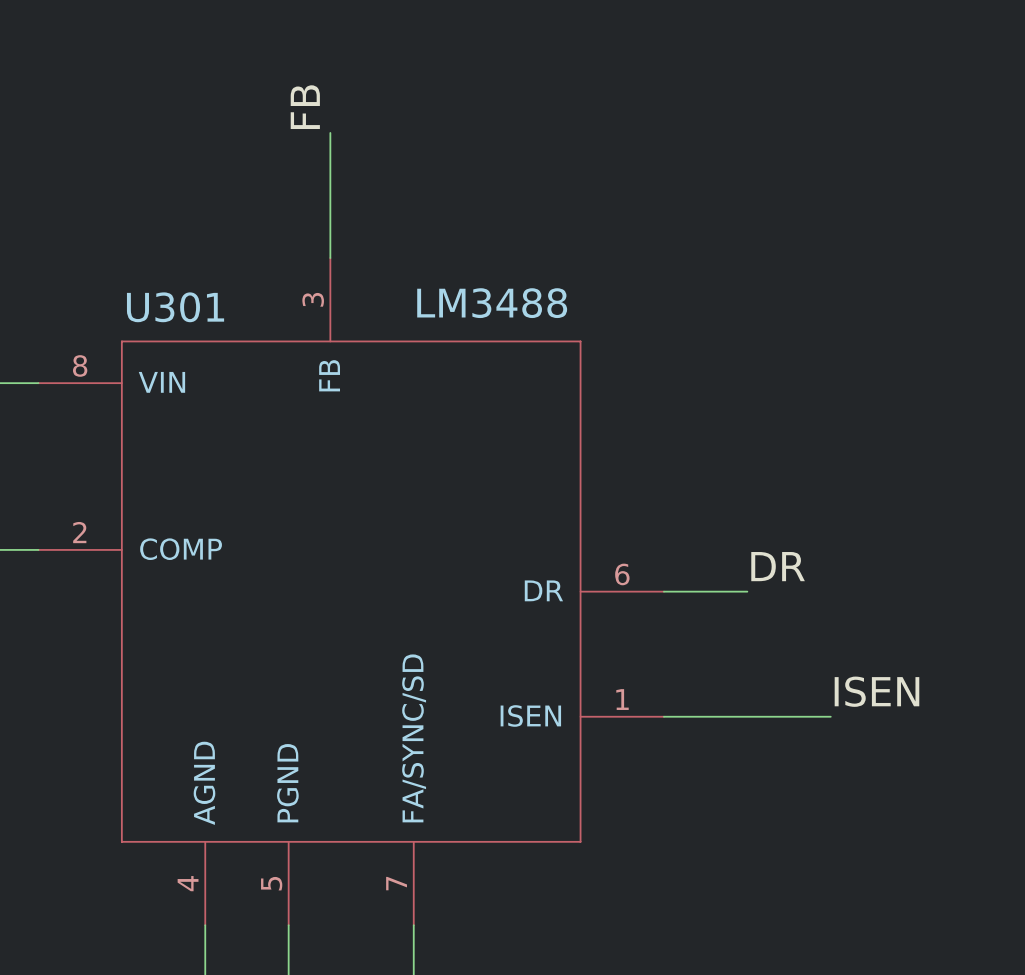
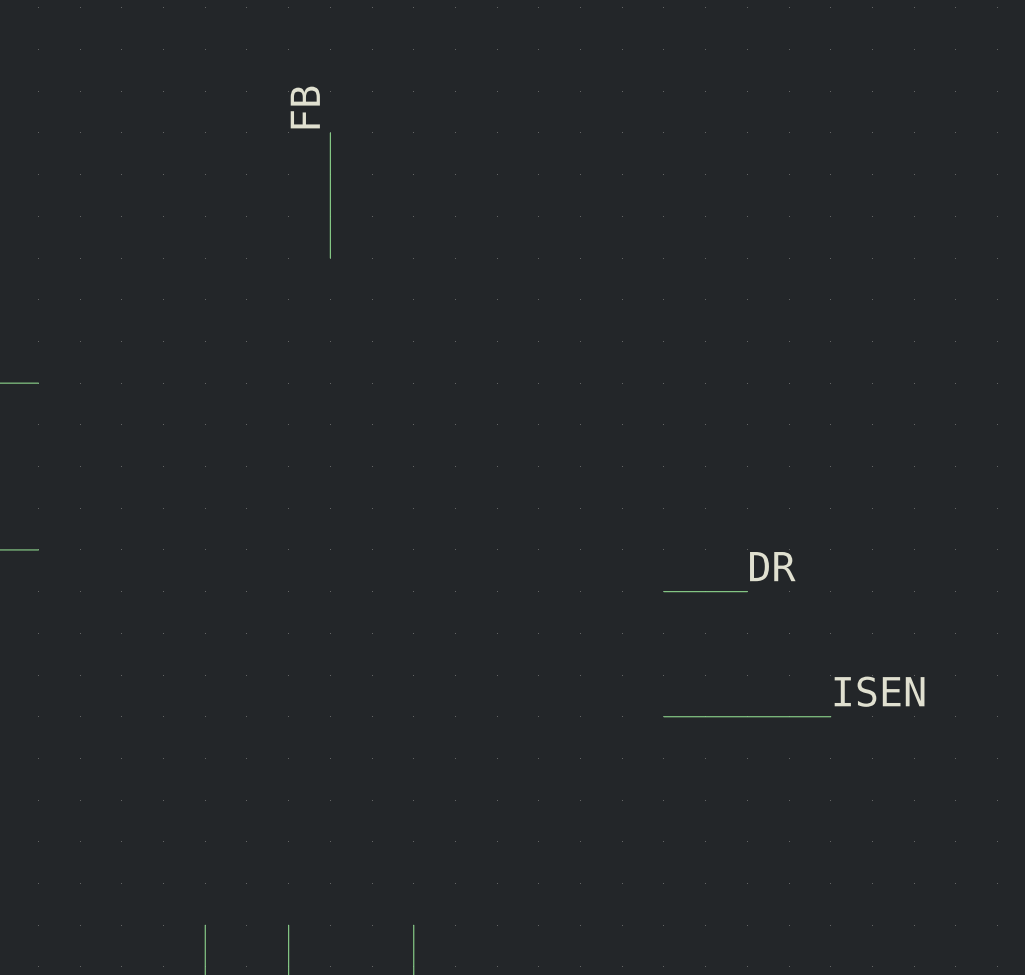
U301: LM3488 (351, 591) -> none

